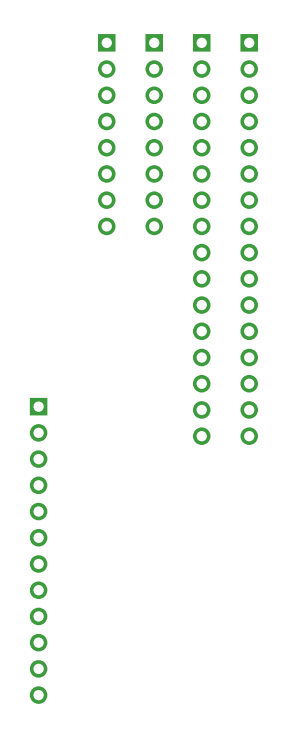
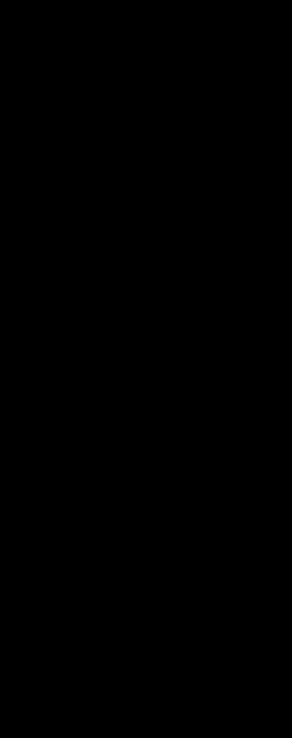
part: (106, 134) -> none
part: (154, 134) -> none
part: (201, 239) -> none
part: (249, 239) -> none
part: (38, 550) -> none

